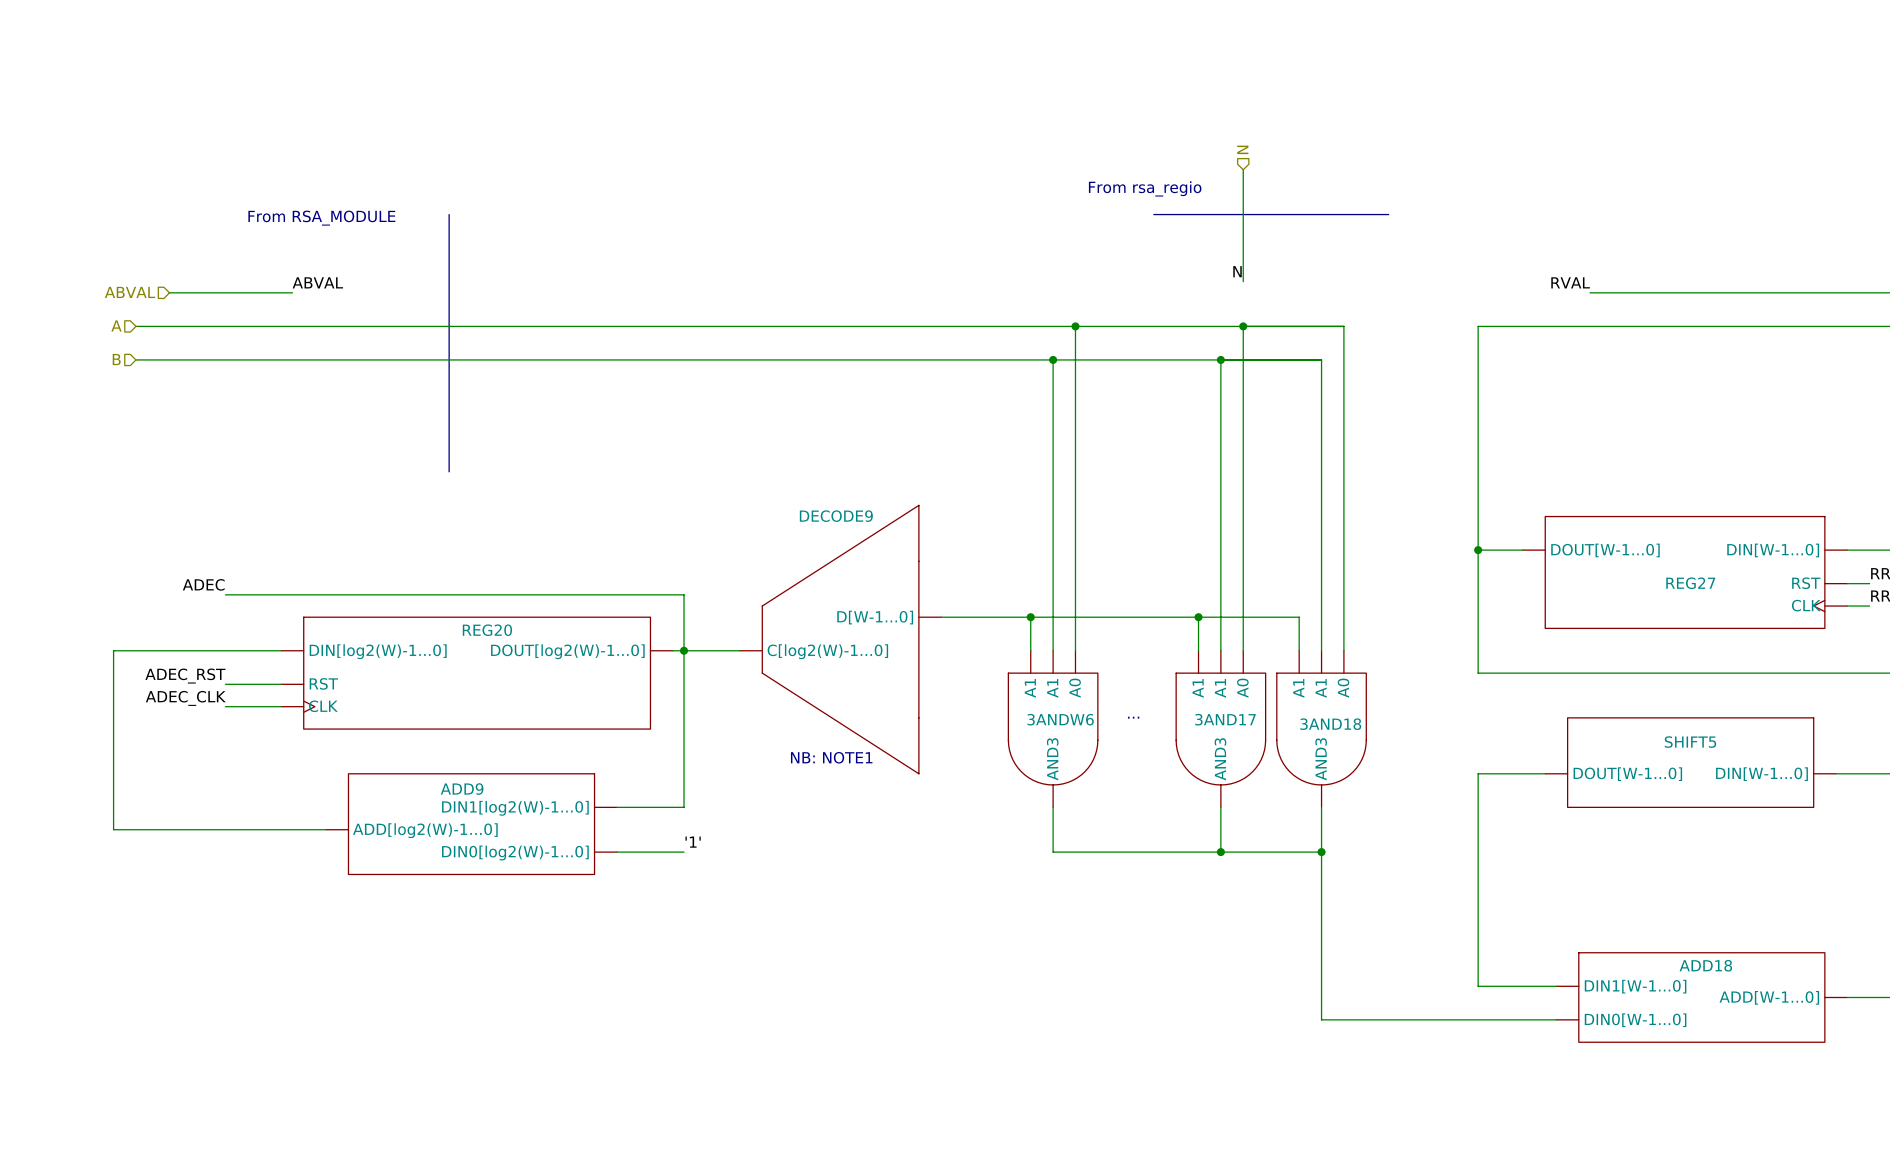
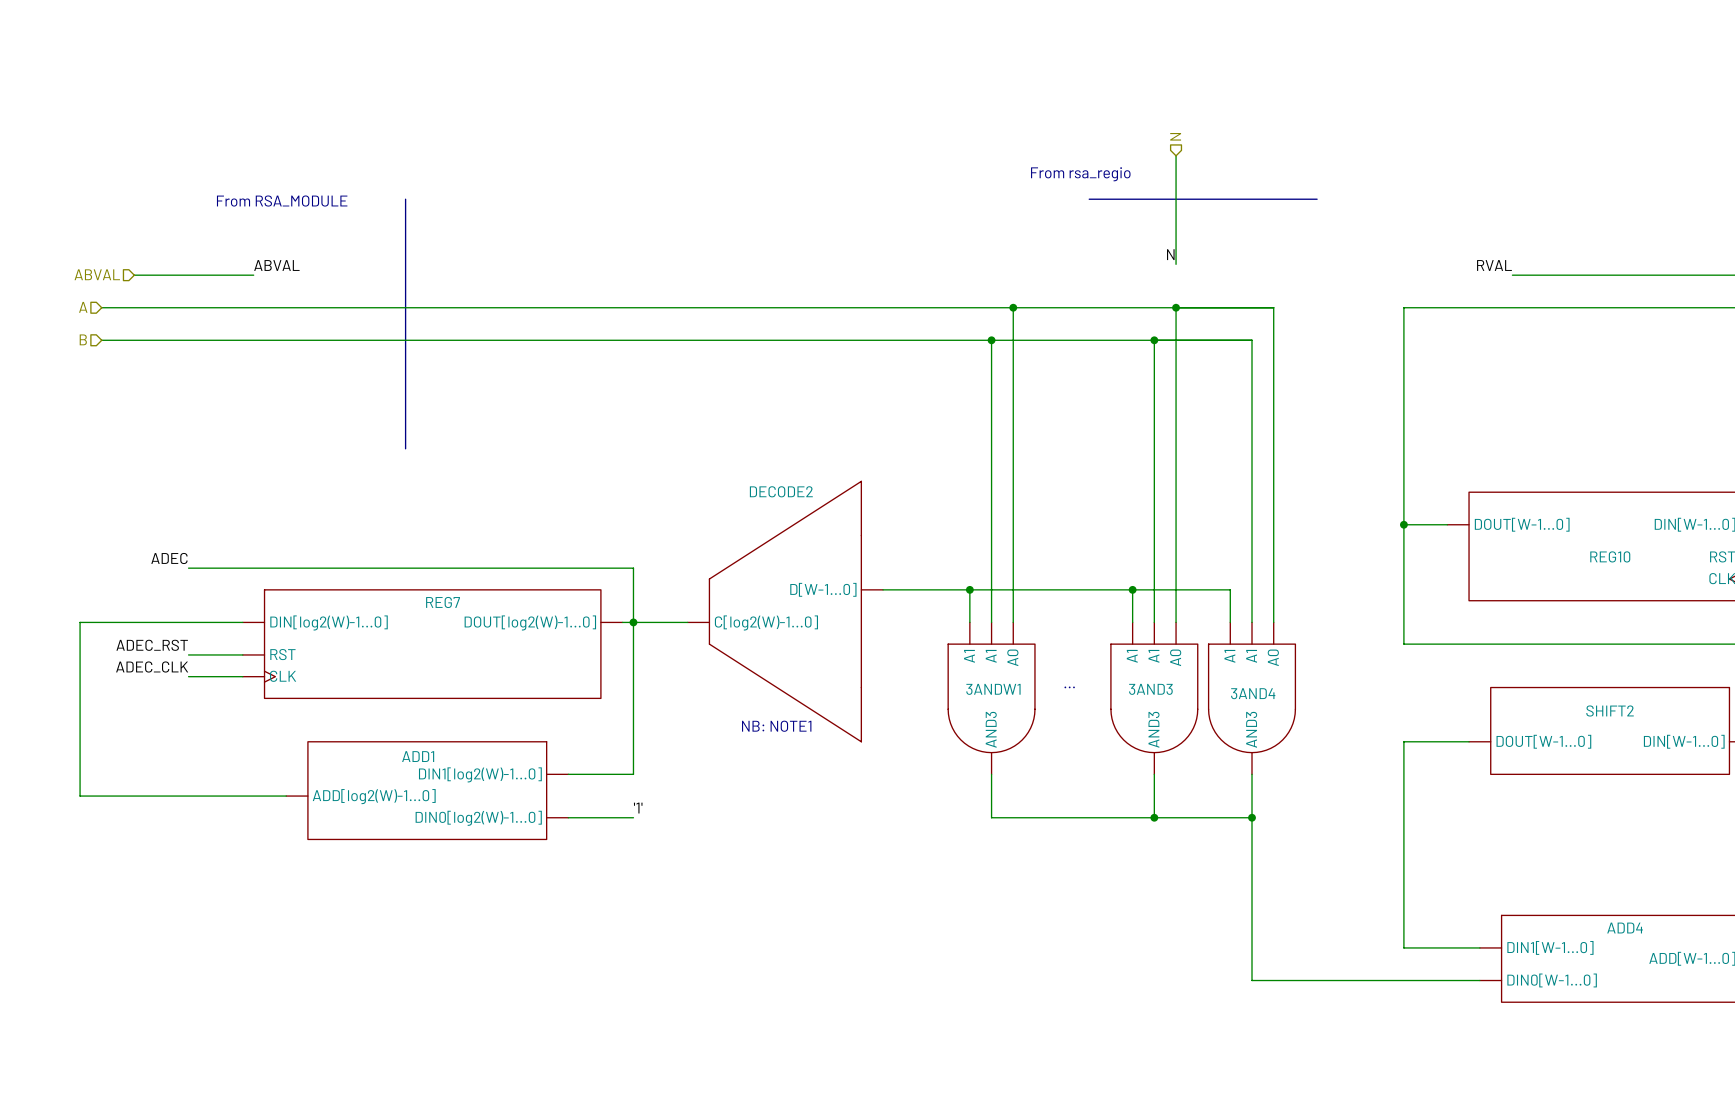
DECODE9 name: DECODE9 (836, 516) -> DECODE2 (781, 491)
REG27 name: REG27 (1690, 583) -> REG10 (1610, 556)
REG20 name: REG20 (487, 630) -> REG7 (443, 602)
3ANDW6 name: 3ANDW6 (1060, 719) -> 3ANDW1 (993, 689)
3AND17 name: 3AND17 (1225, 719) -> 3AND3 (1150, 689)
3AND18 name: 3AND18 (1330, 724) -> 3AND4 (1253, 693)
SHIFT5 name: SHIFT5 (1690, 742) -> SHIFT2 (1610, 711)
ADD9 name: ADD9 (462, 789) -> ADD1 (418, 756)
ADD18 name: ADD18 (1705, 965) -> ADD4 (1625, 928)

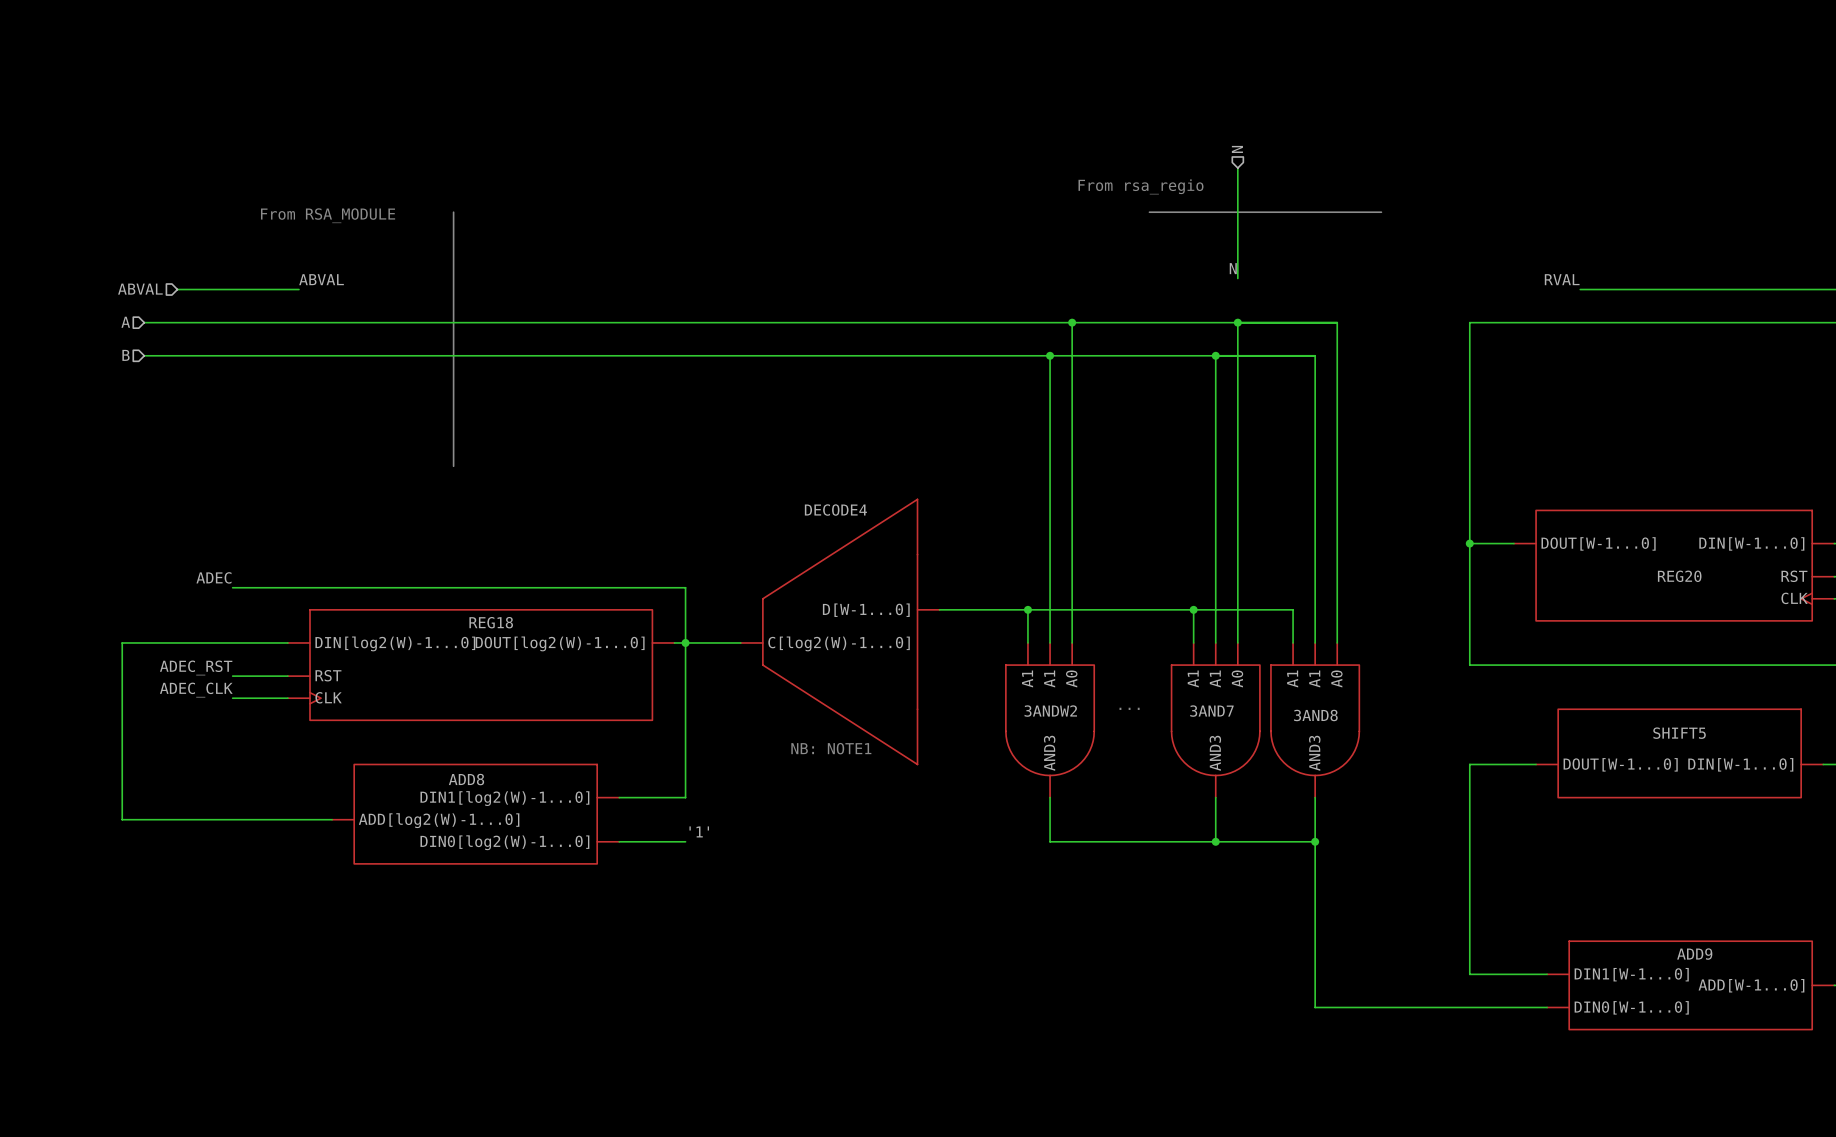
DECODE2 name: DECODE2 (781, 491) -> DECODE4 (835, 510)
REG10 name: REG10 (1610, 556) -> REG20 (1679, 576)
REG7 name: REG7 (443, 602) -> REG18 (491, 622)
3ANDW1 name: 3ANDW1 (993, 689) -> 3ANDW2 (1050, 711)
3AND3 name: 3AND3 (1150, 689) -> 3AND7 (1211, 711)
3AND4 name: 3AND4 (1253, 693) -> 3AND8 (1315, 715)
SHIFT2 name: SHIFT2 (1610, 711) -> SHIFT5 (1679, 733)
ADD1 name: ADD1 (418, 756) -> ADD8 (466, 779)
ADD4 name: ADD4 (1625, 928) -> ADD9 (1694, 954)

